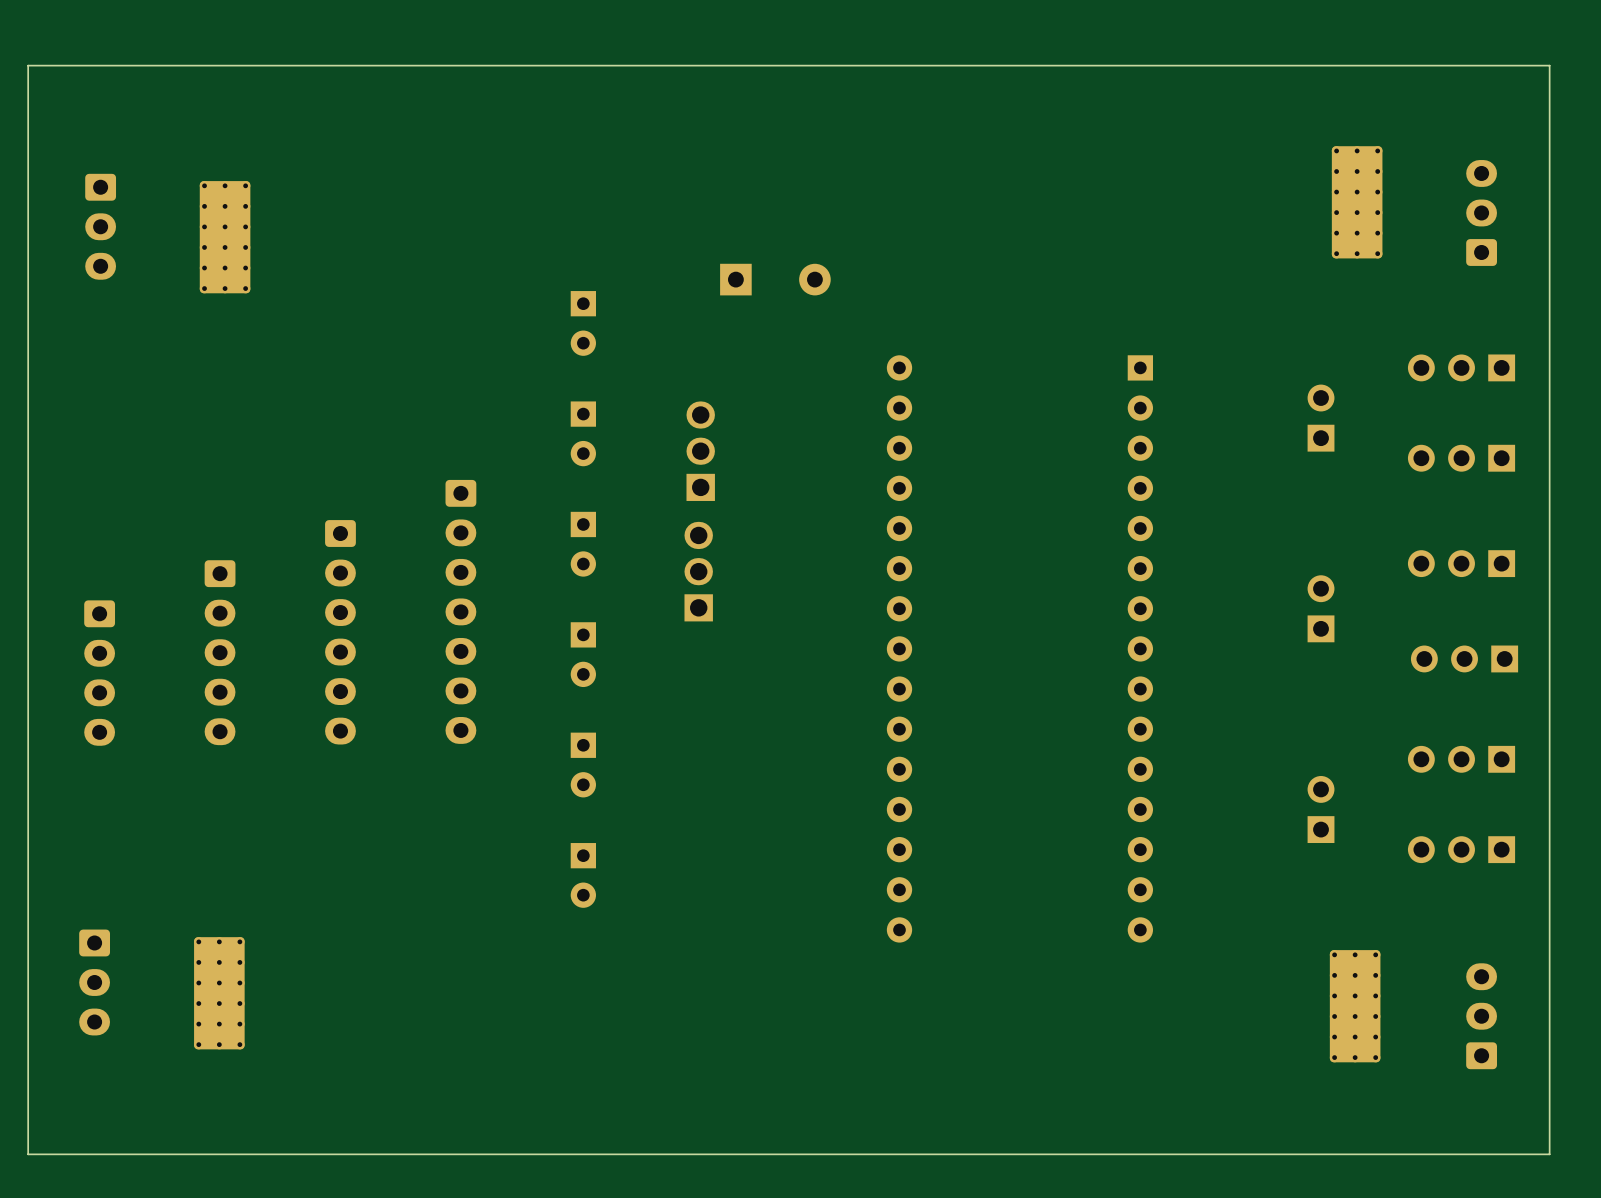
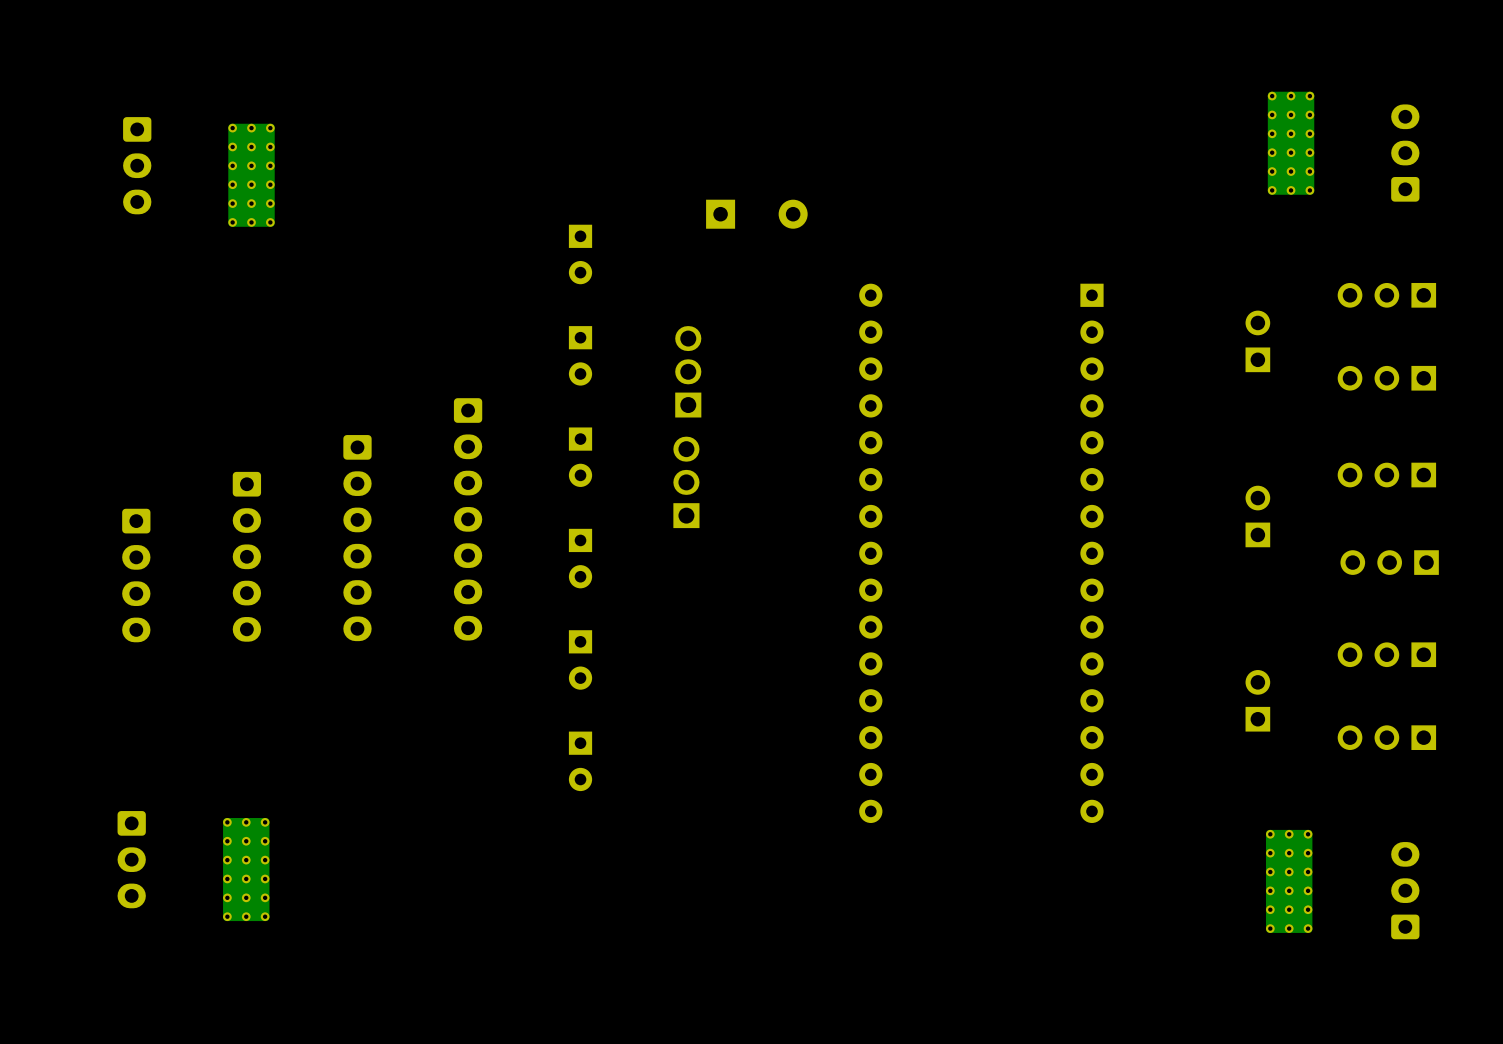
board edge: (1549, 65) (28, 65) (28, 1154) (1549, 1154) (1549, 65) -> none

